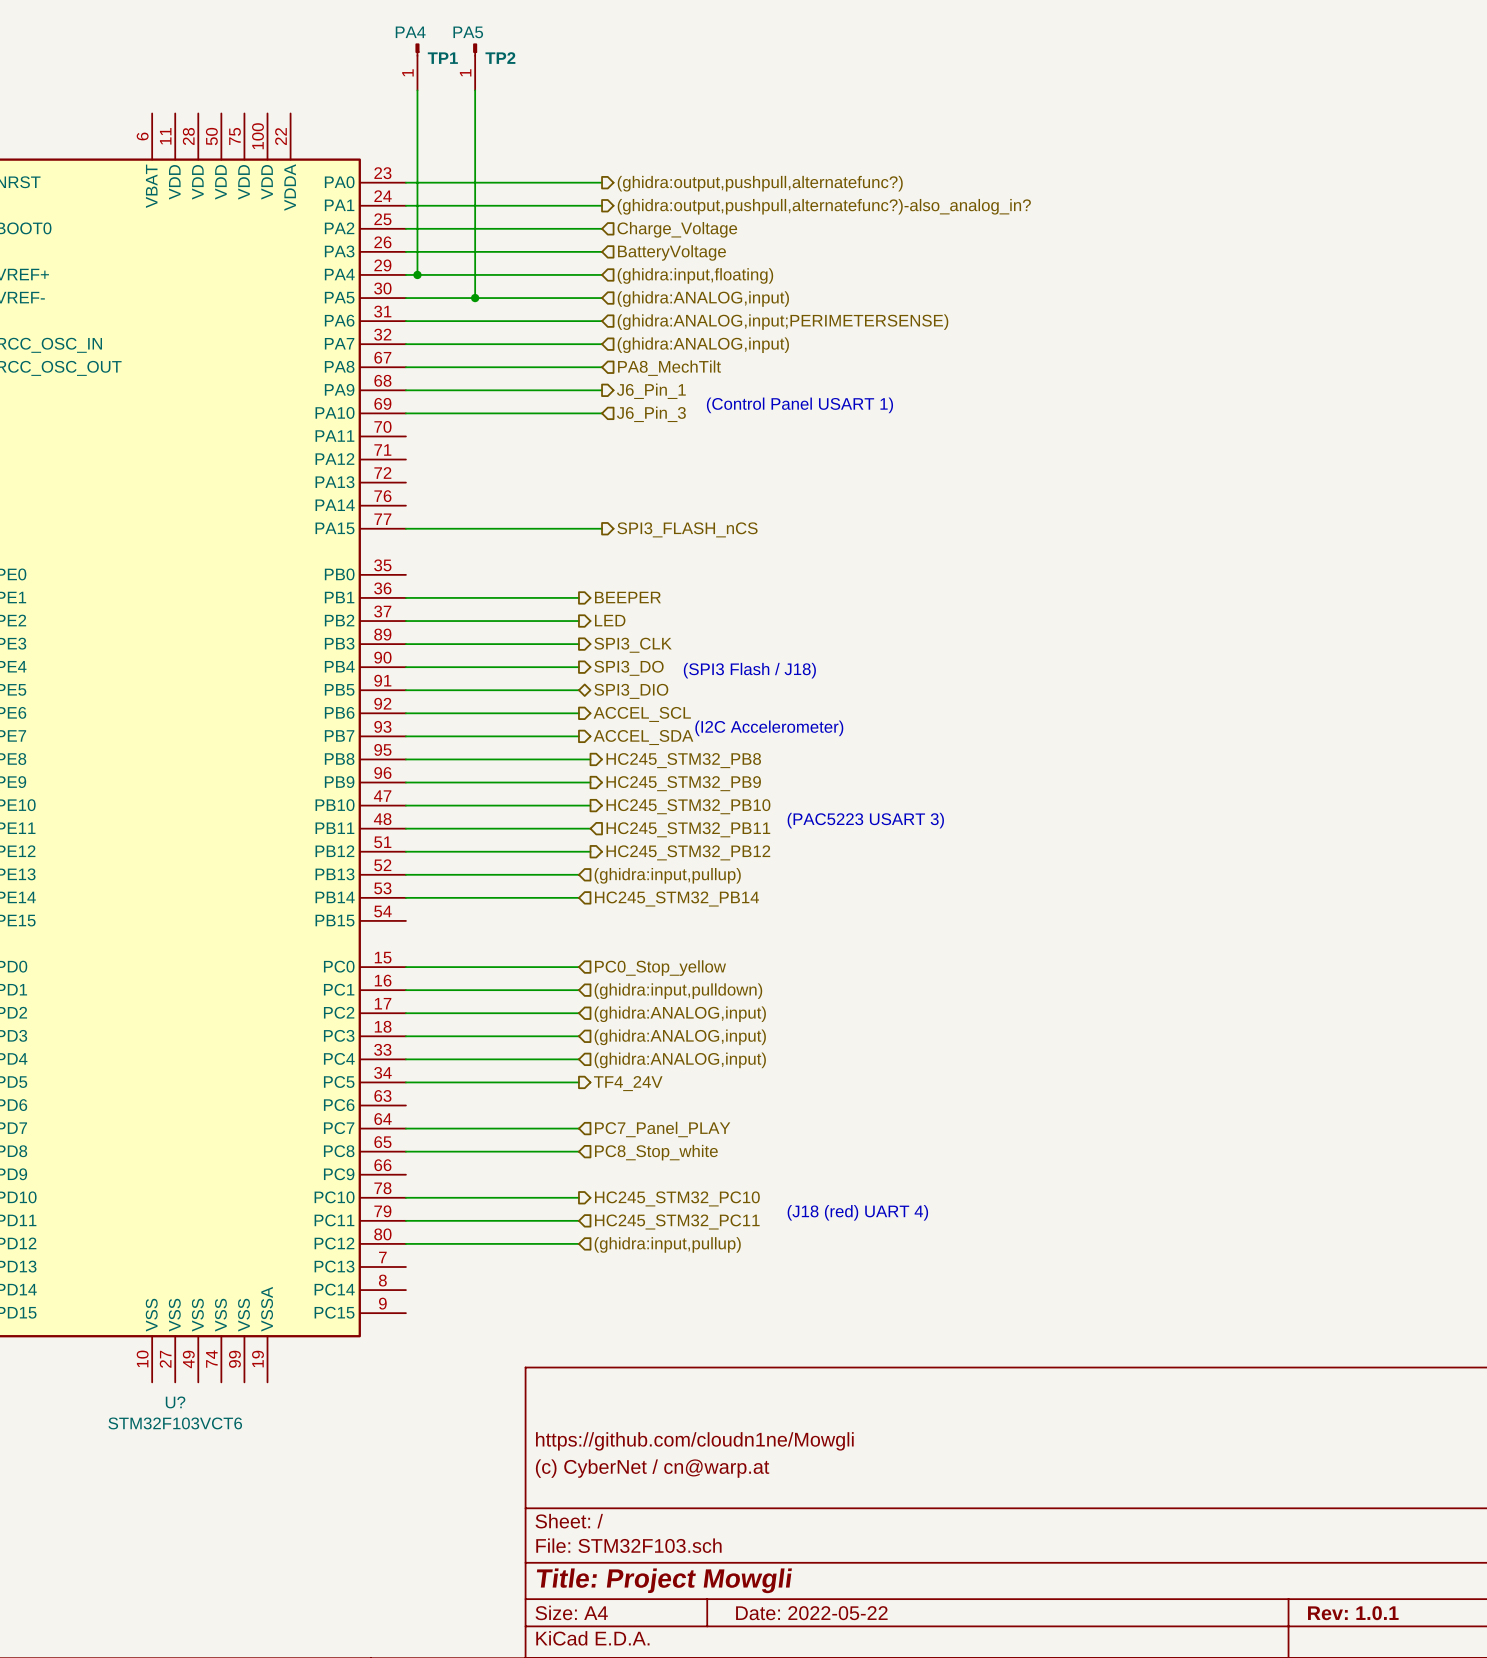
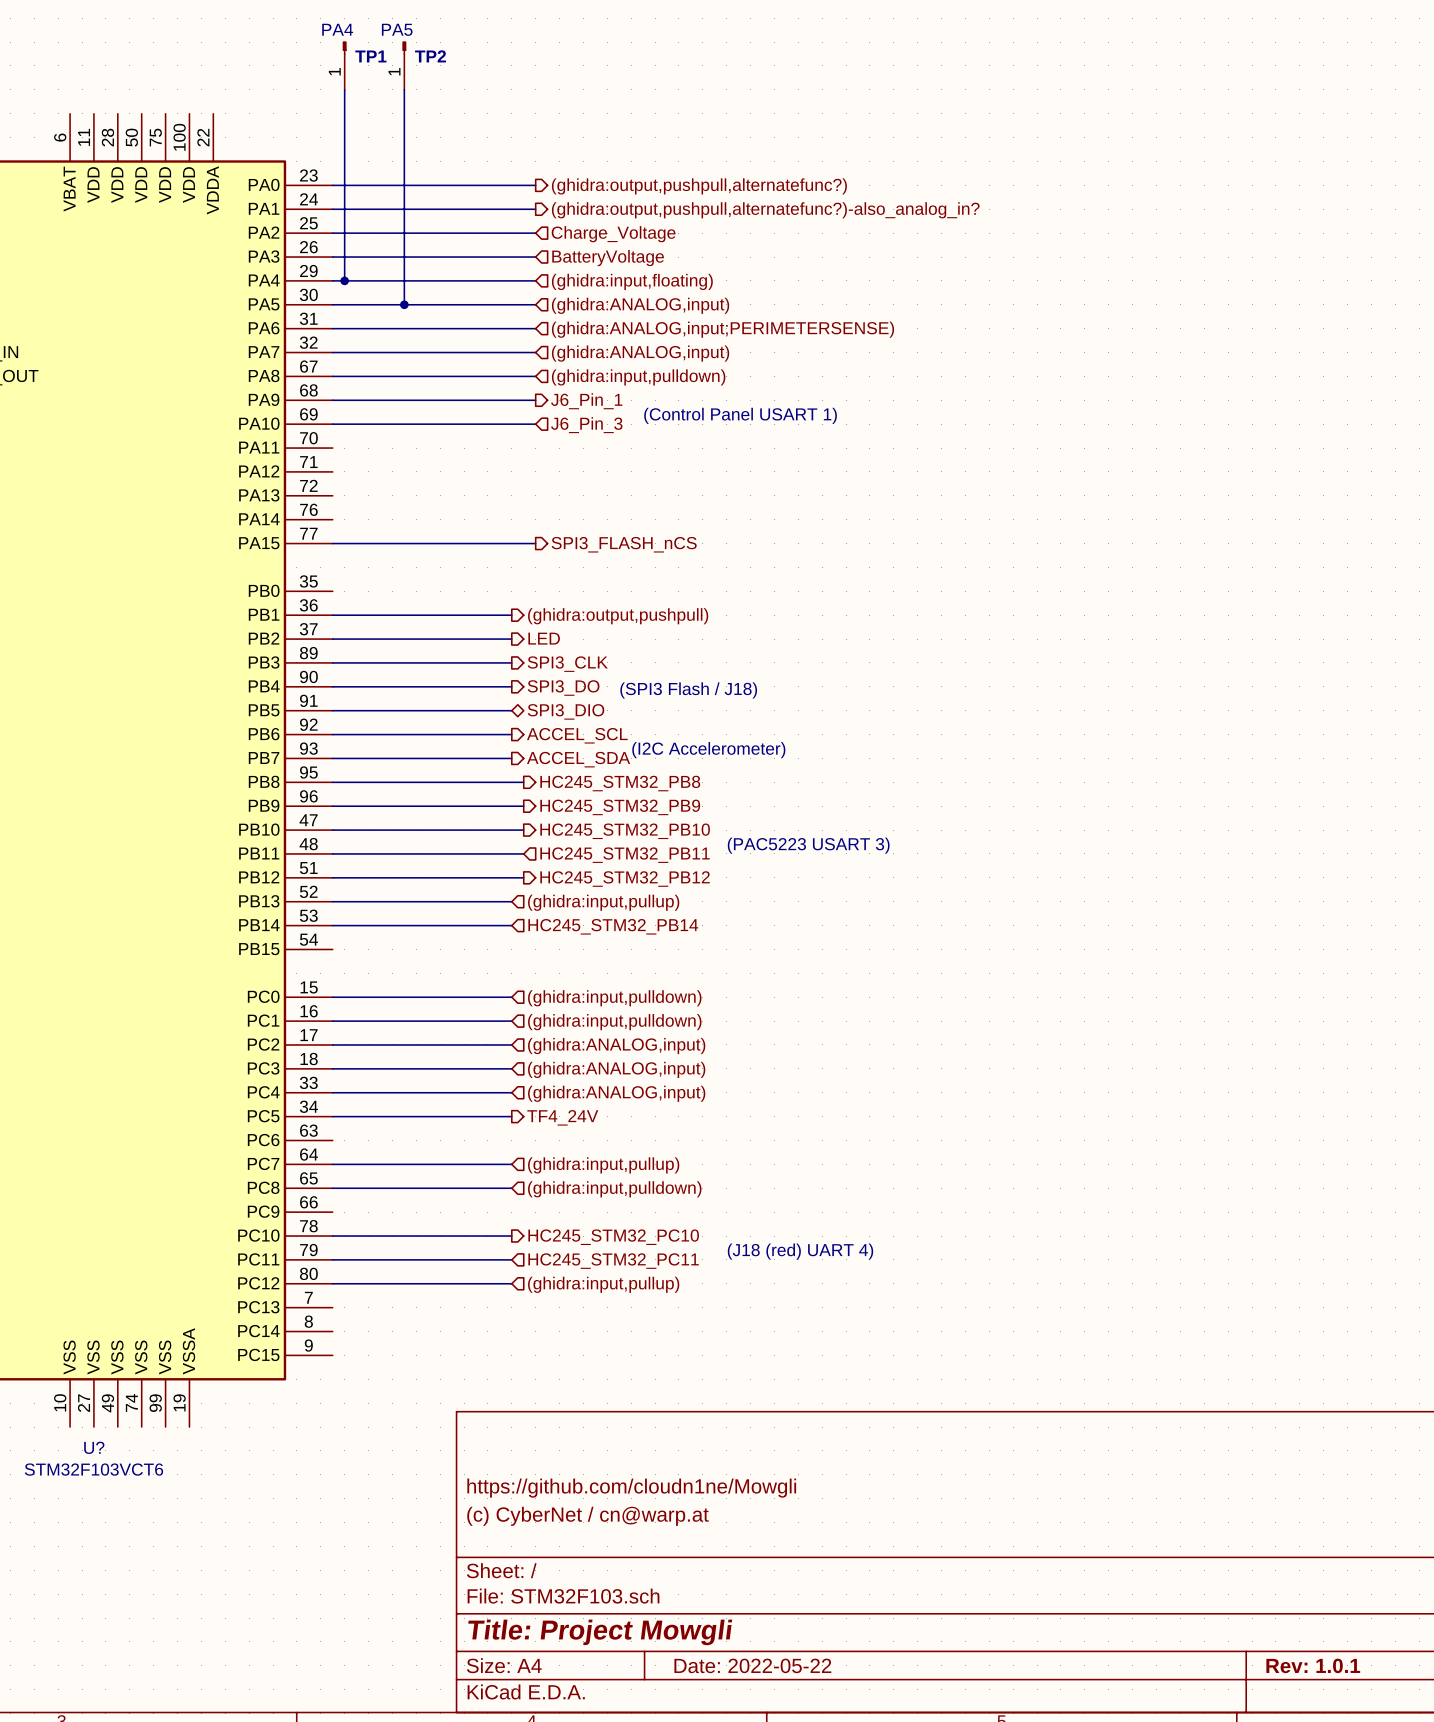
hierarchical label: PA8_MechTilt (669, 368) -> (ghidra:input,pulldown) (638, 377)
hierarchical label: BEEPER (627, 597) -> (ghidra:output,pushpull) (618, 616)
hierarchical label: PC0_Stop_yellow (660, 968) -> (ghidra:input,pulldown) (614, 998)
hierarchical label: PC7_Panel_PLAY (662, 1129) -> (ghidra:input,pullup) (603, 1165)
hierarchical label: PC8_Stop_white (656, 1152) -> (ghidra:input,pulldown) (614, 1189)

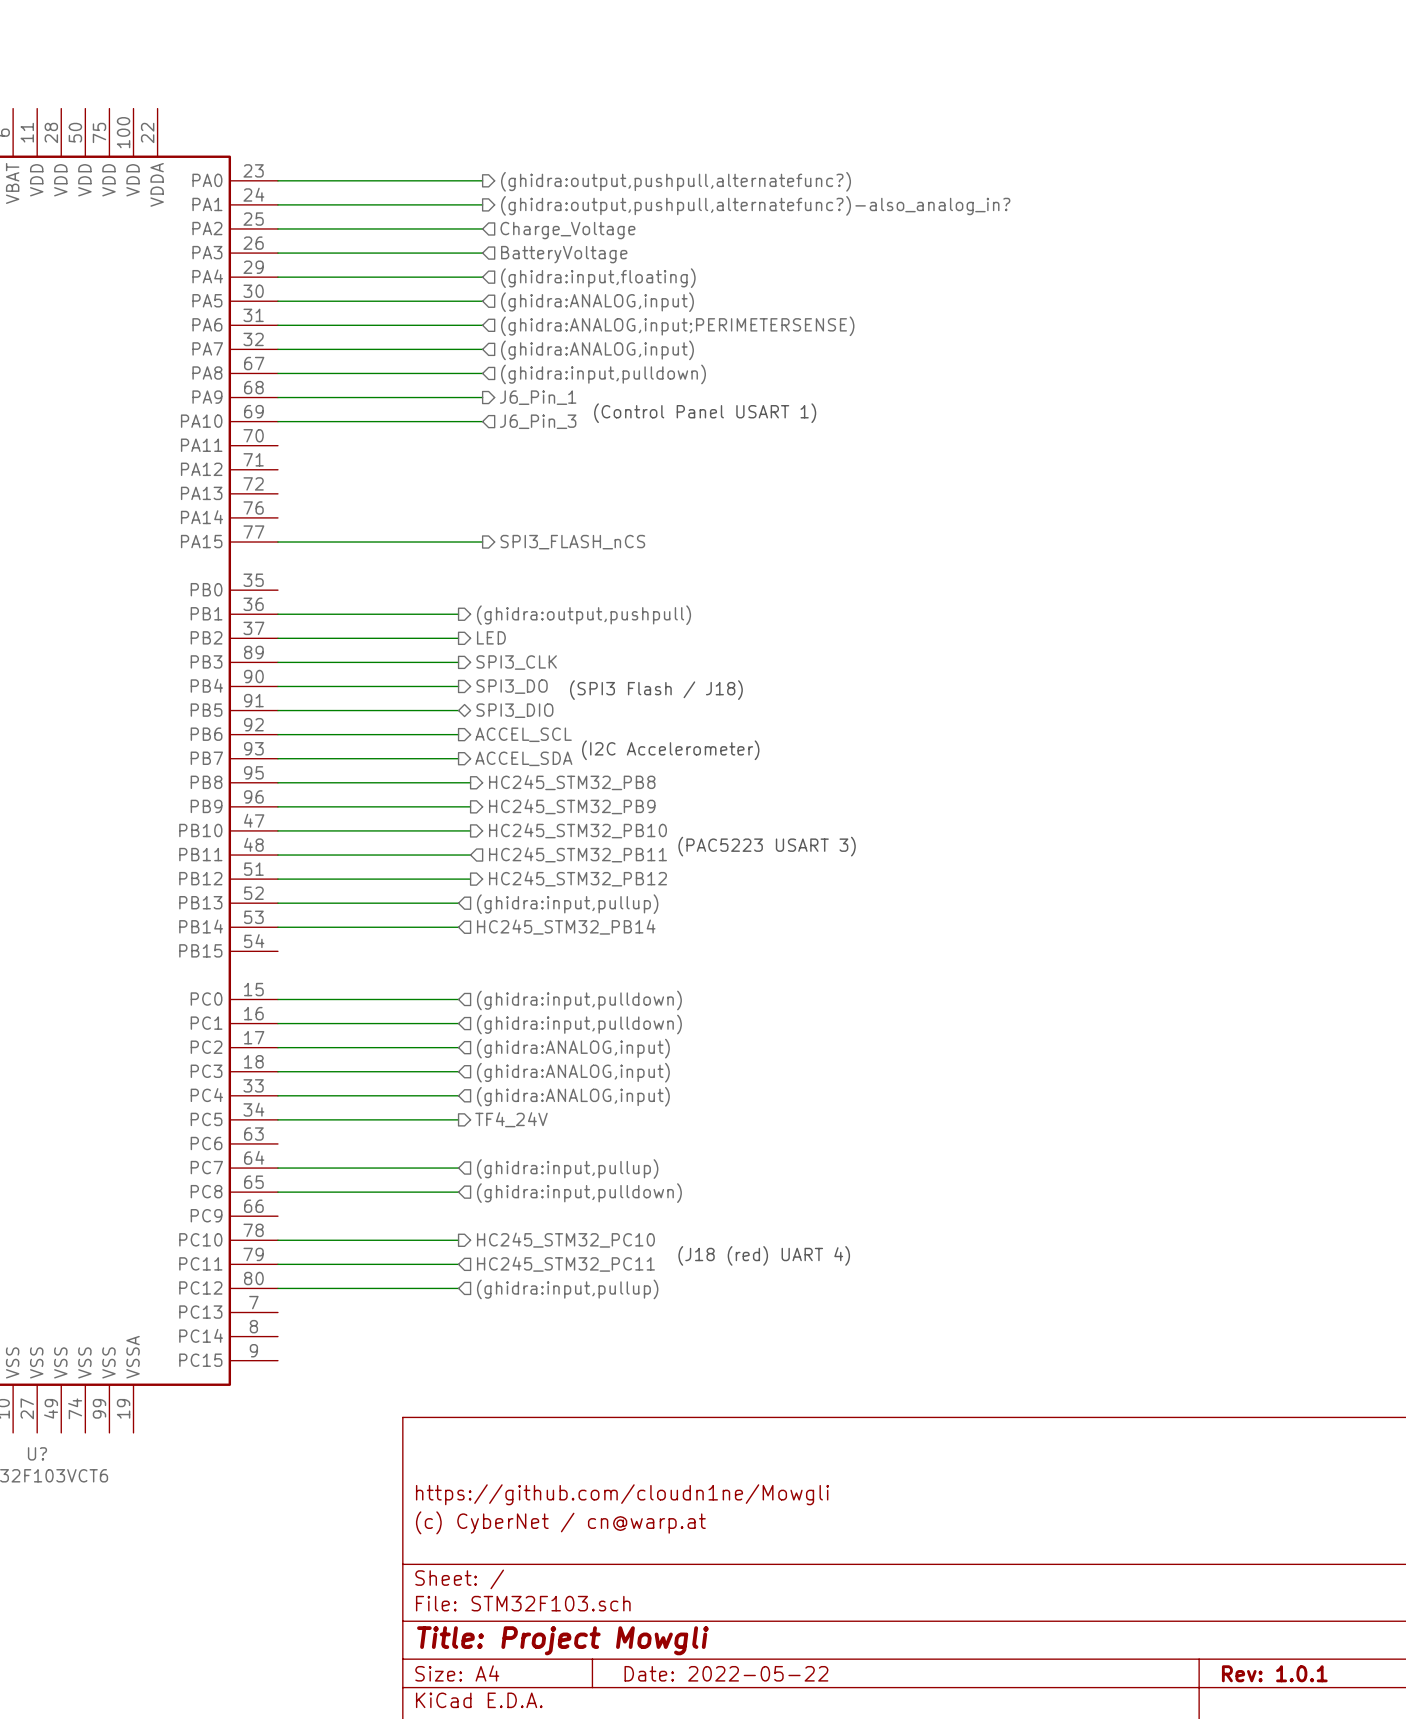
TP1: PA4 (344, 65) -> none
TP2: PA5 (404, 65) -> none
wire: (344, 89) (344, 280) -> none
wire: (404, 89) (404, 304) -> none
junction: (344, 280) -> none
junction: (404, 304) -> none

